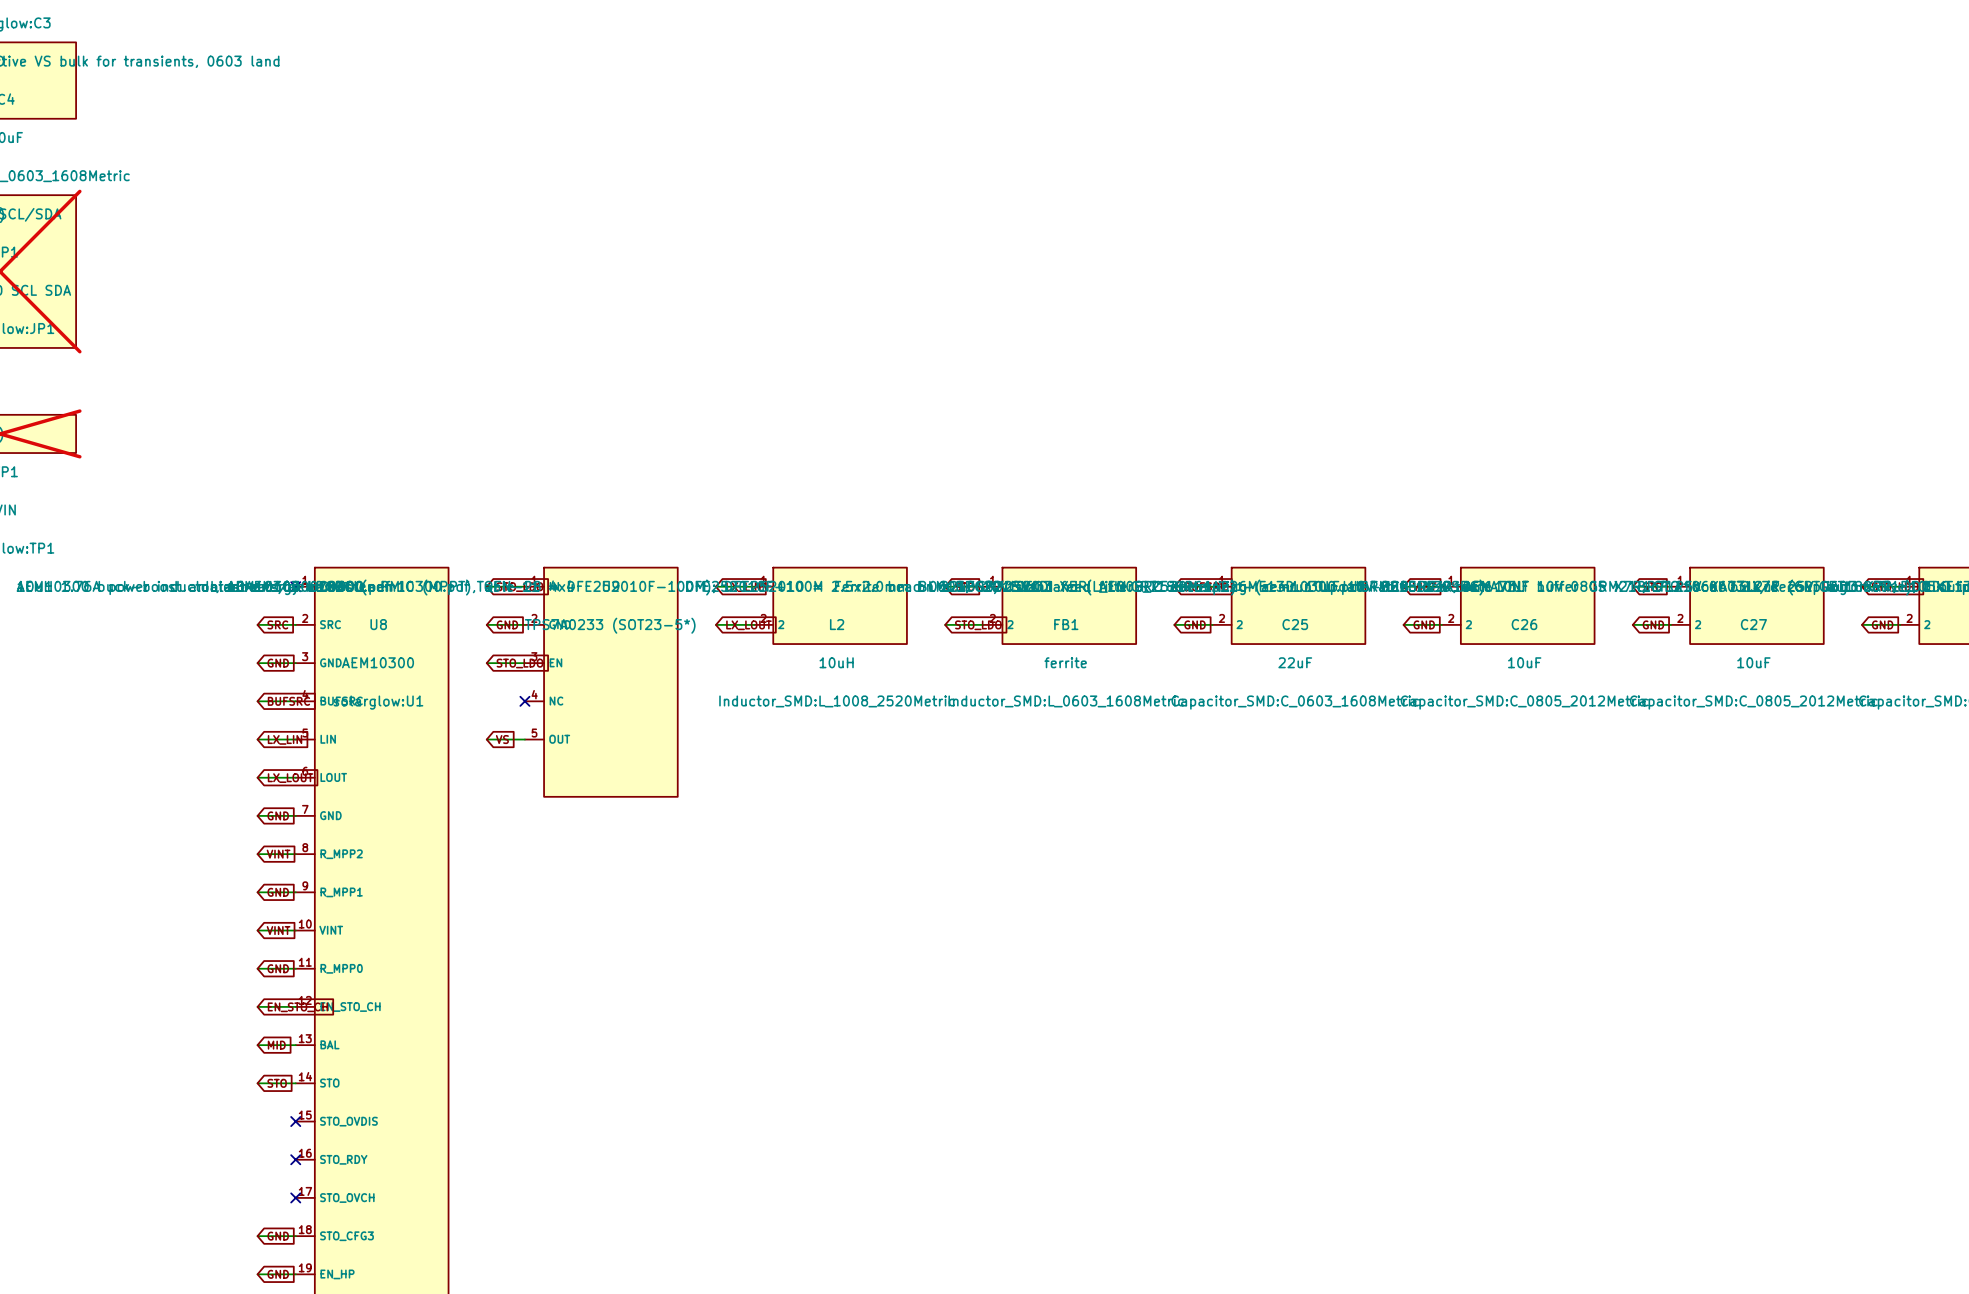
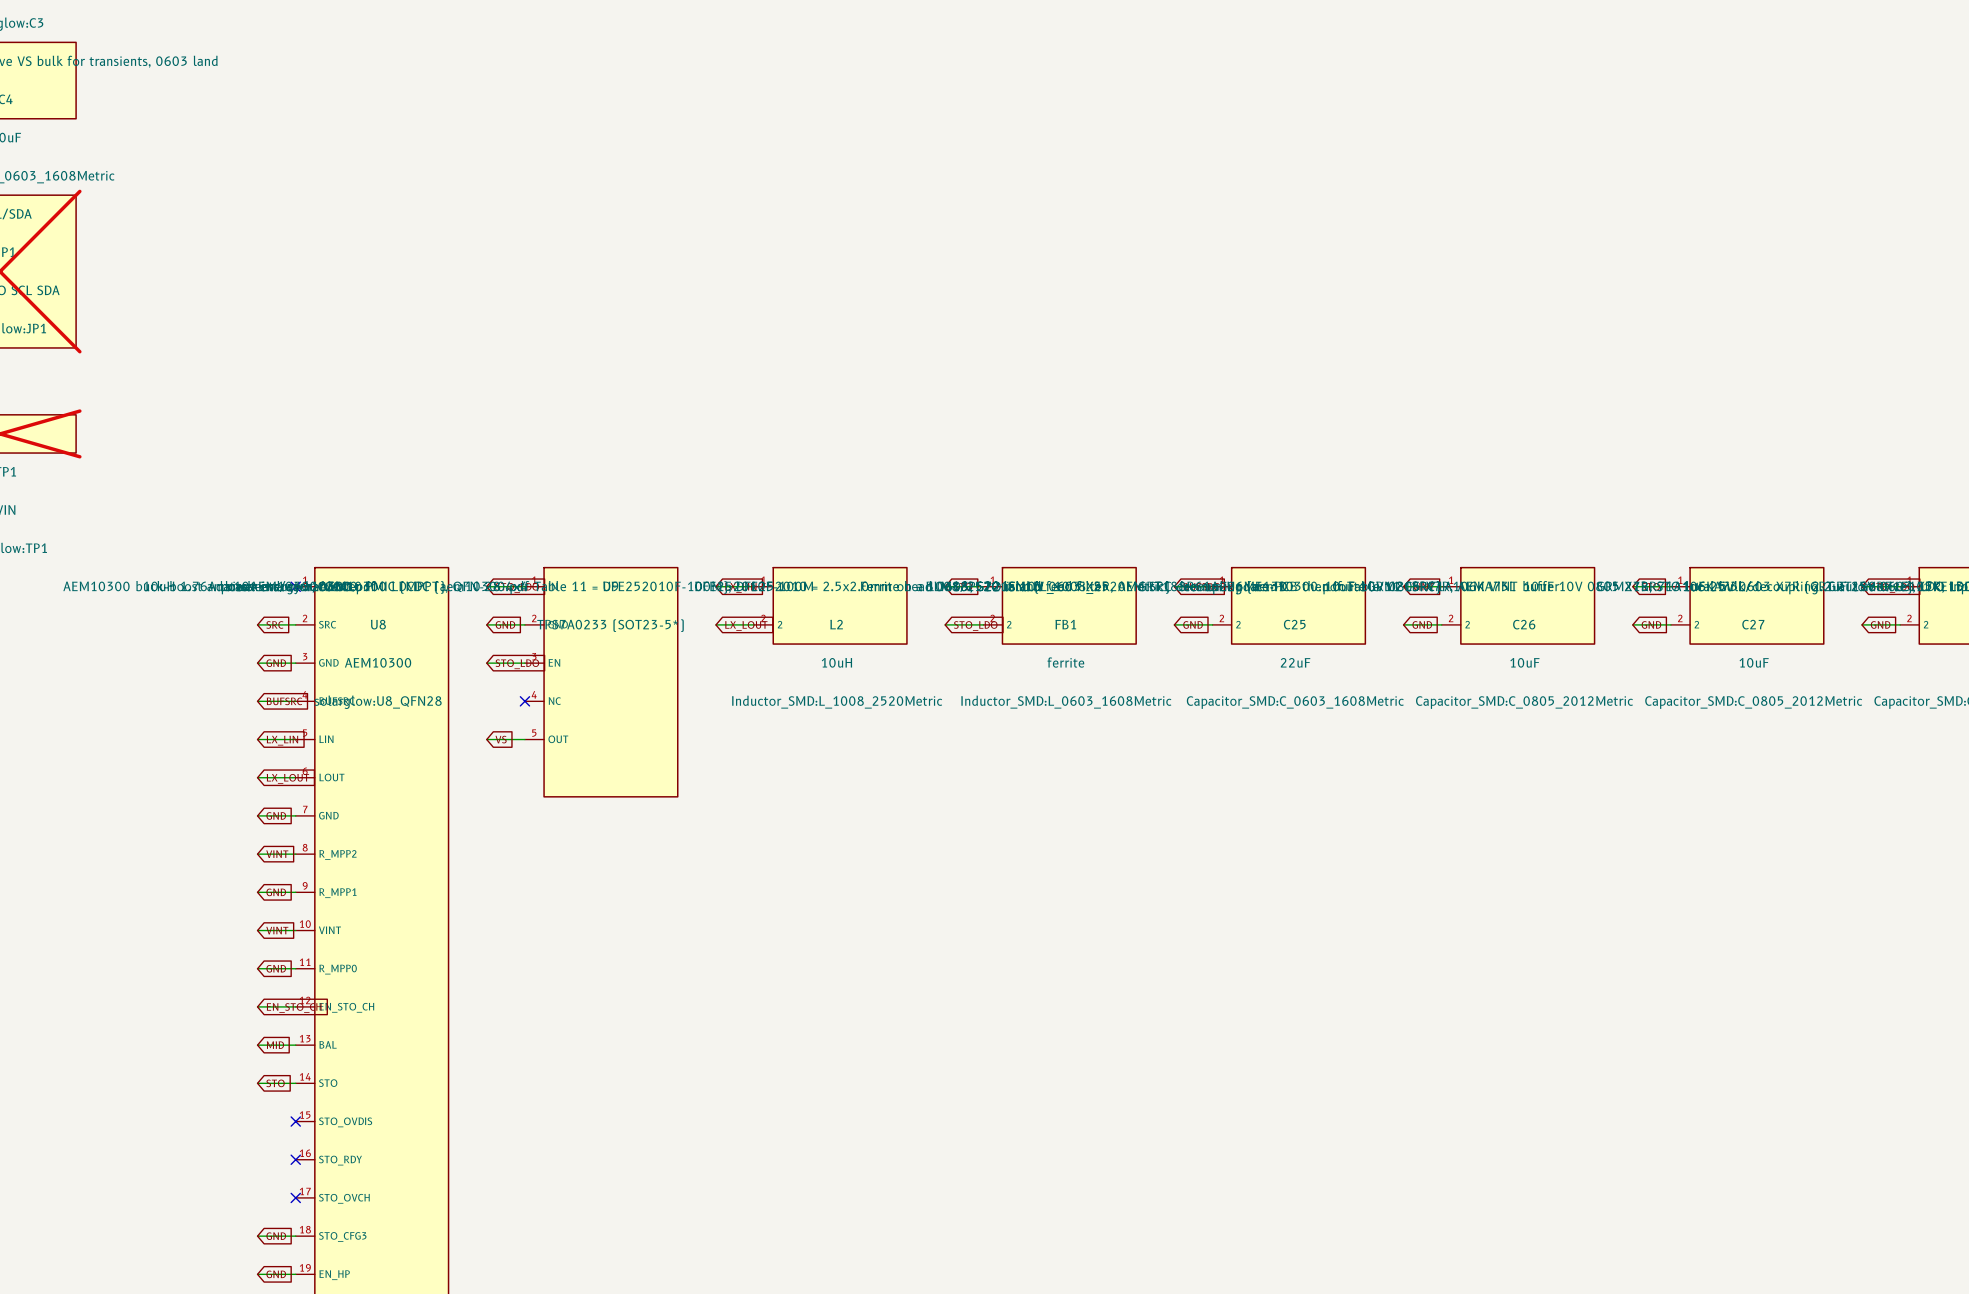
U8 text: solarglow:U1 (378, 702) -> solarglow:U8_QFN28 (378, 702)

